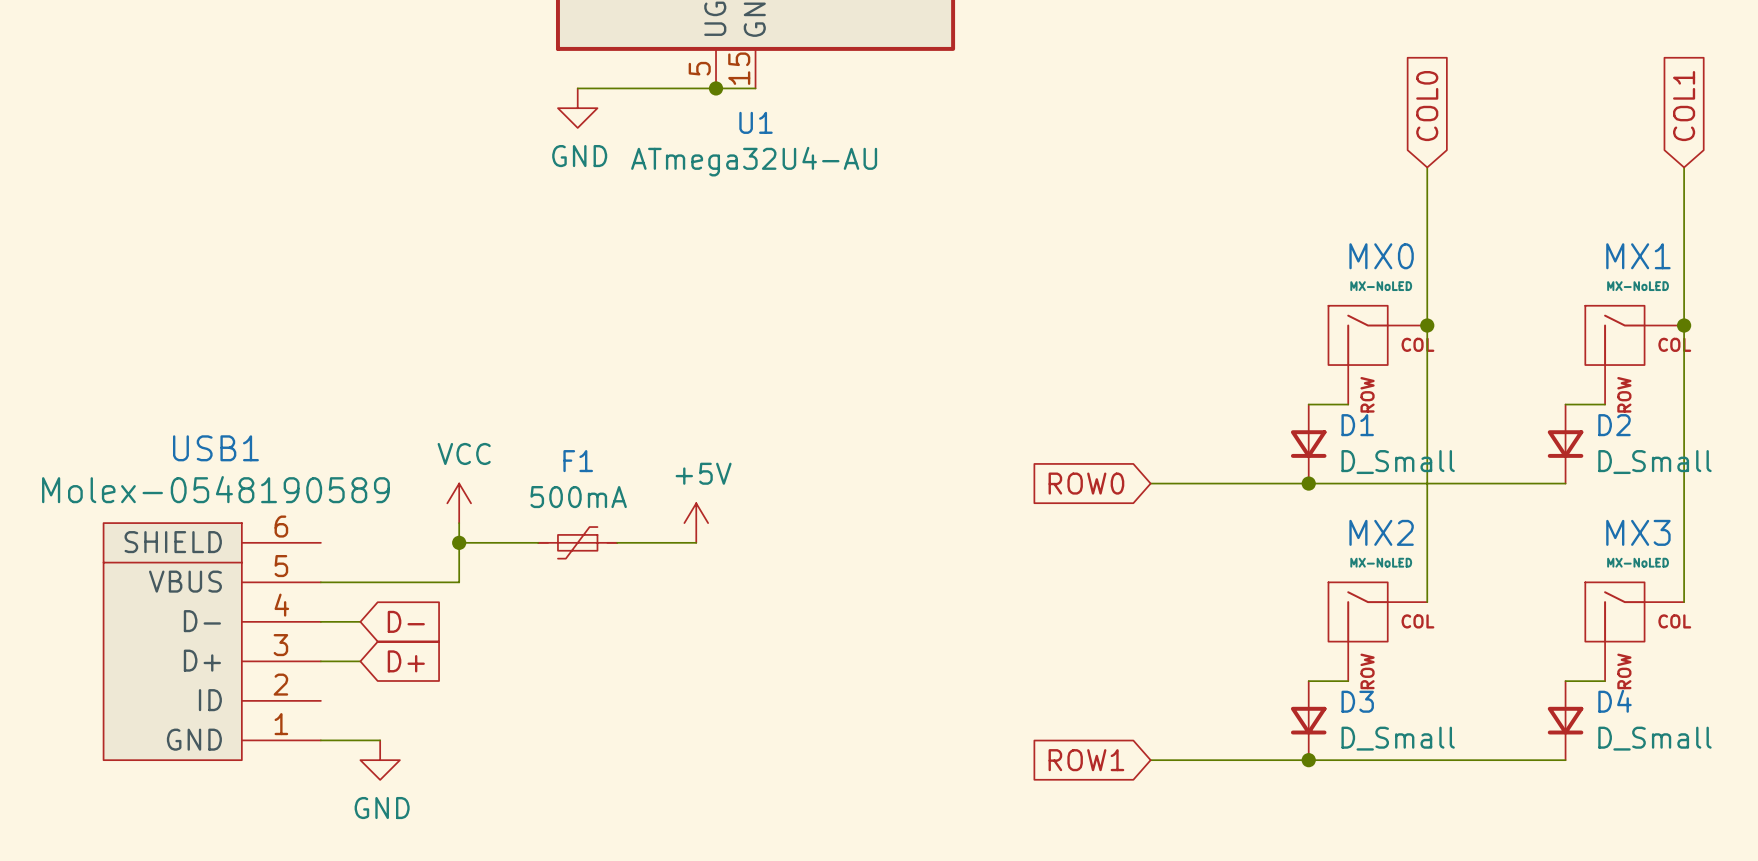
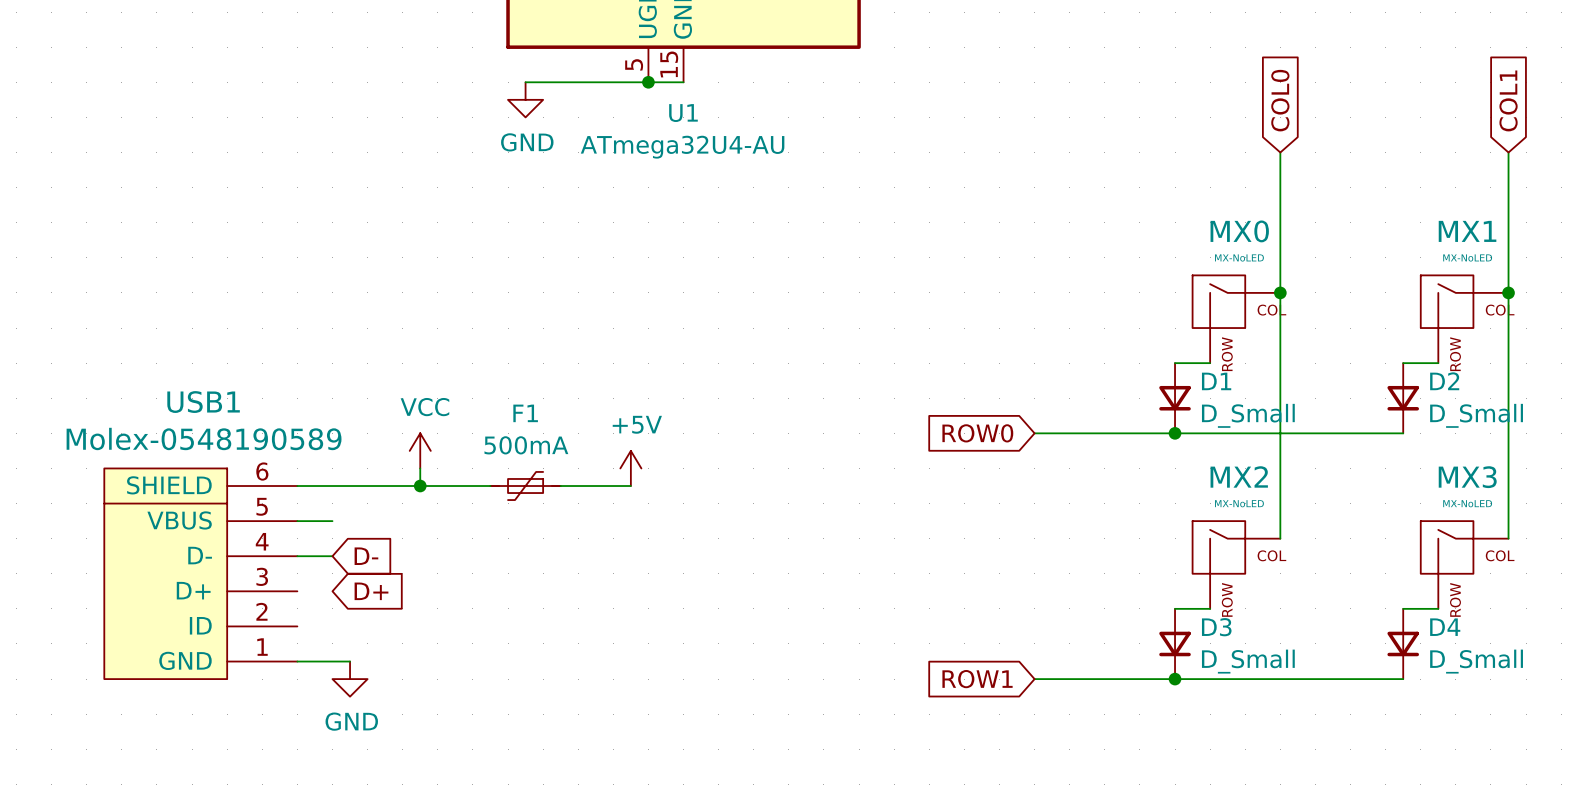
wire: (459, 542) (459, 582) (360, 582) -> (420, 486) (297, 486)
wire: (320, 661) (360, 661) -> none

